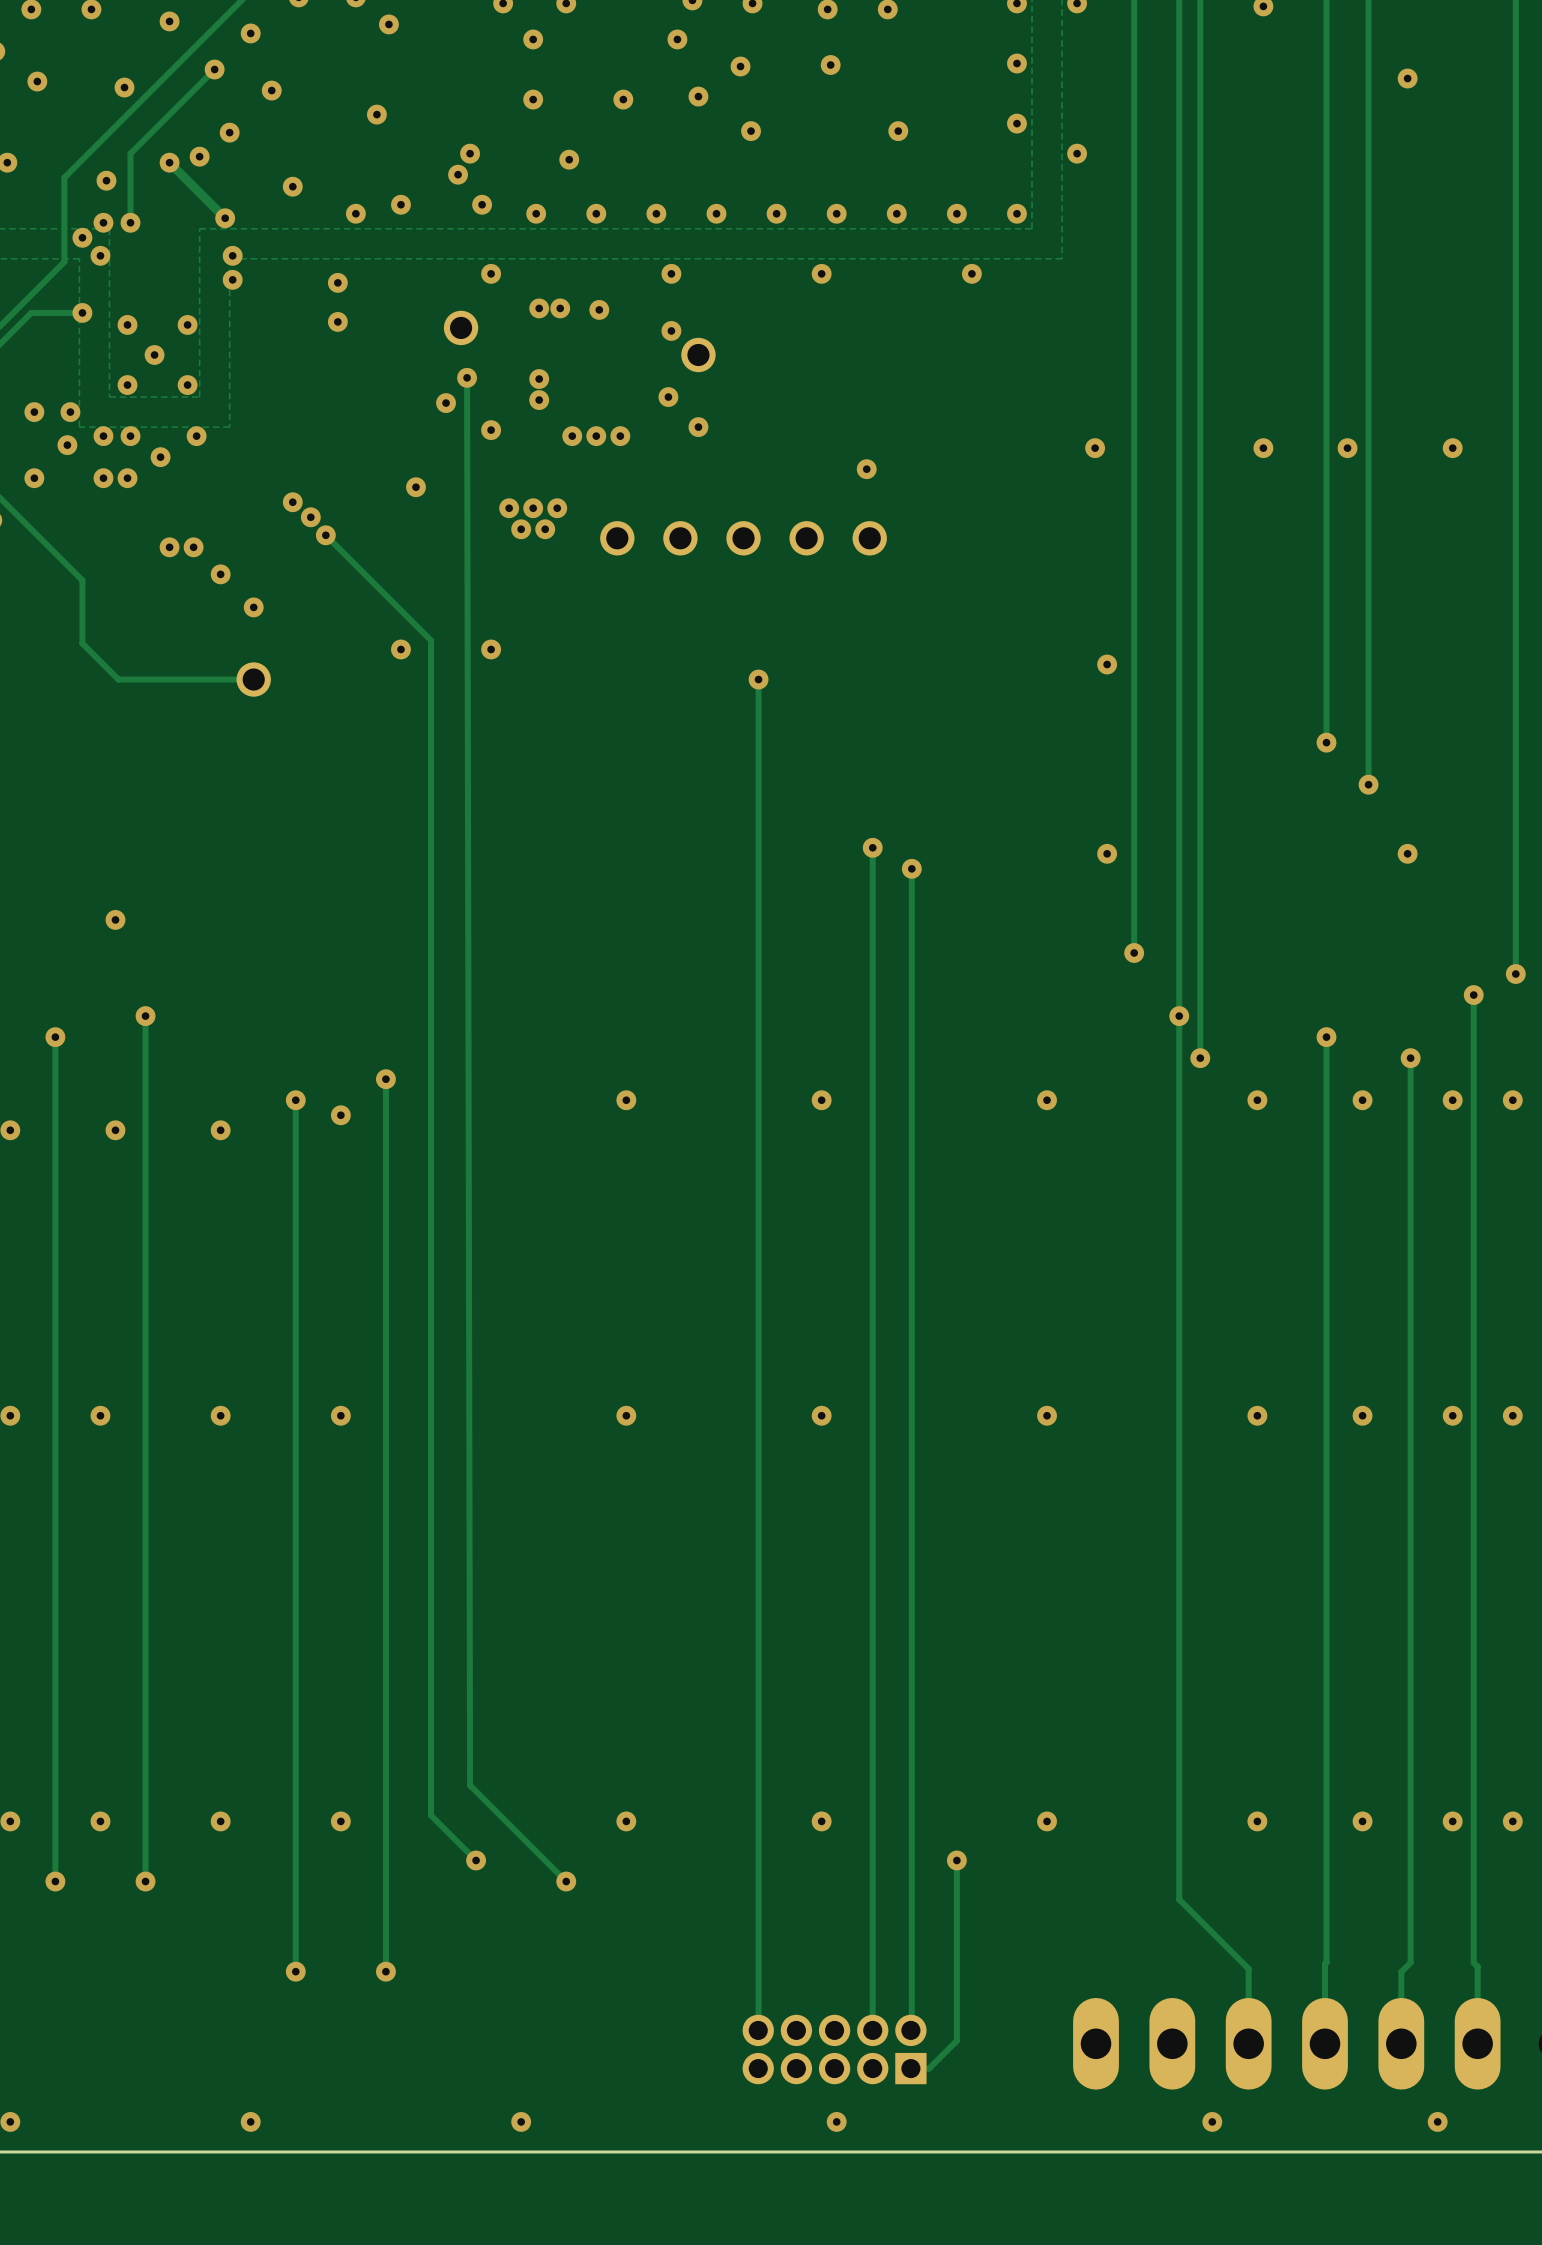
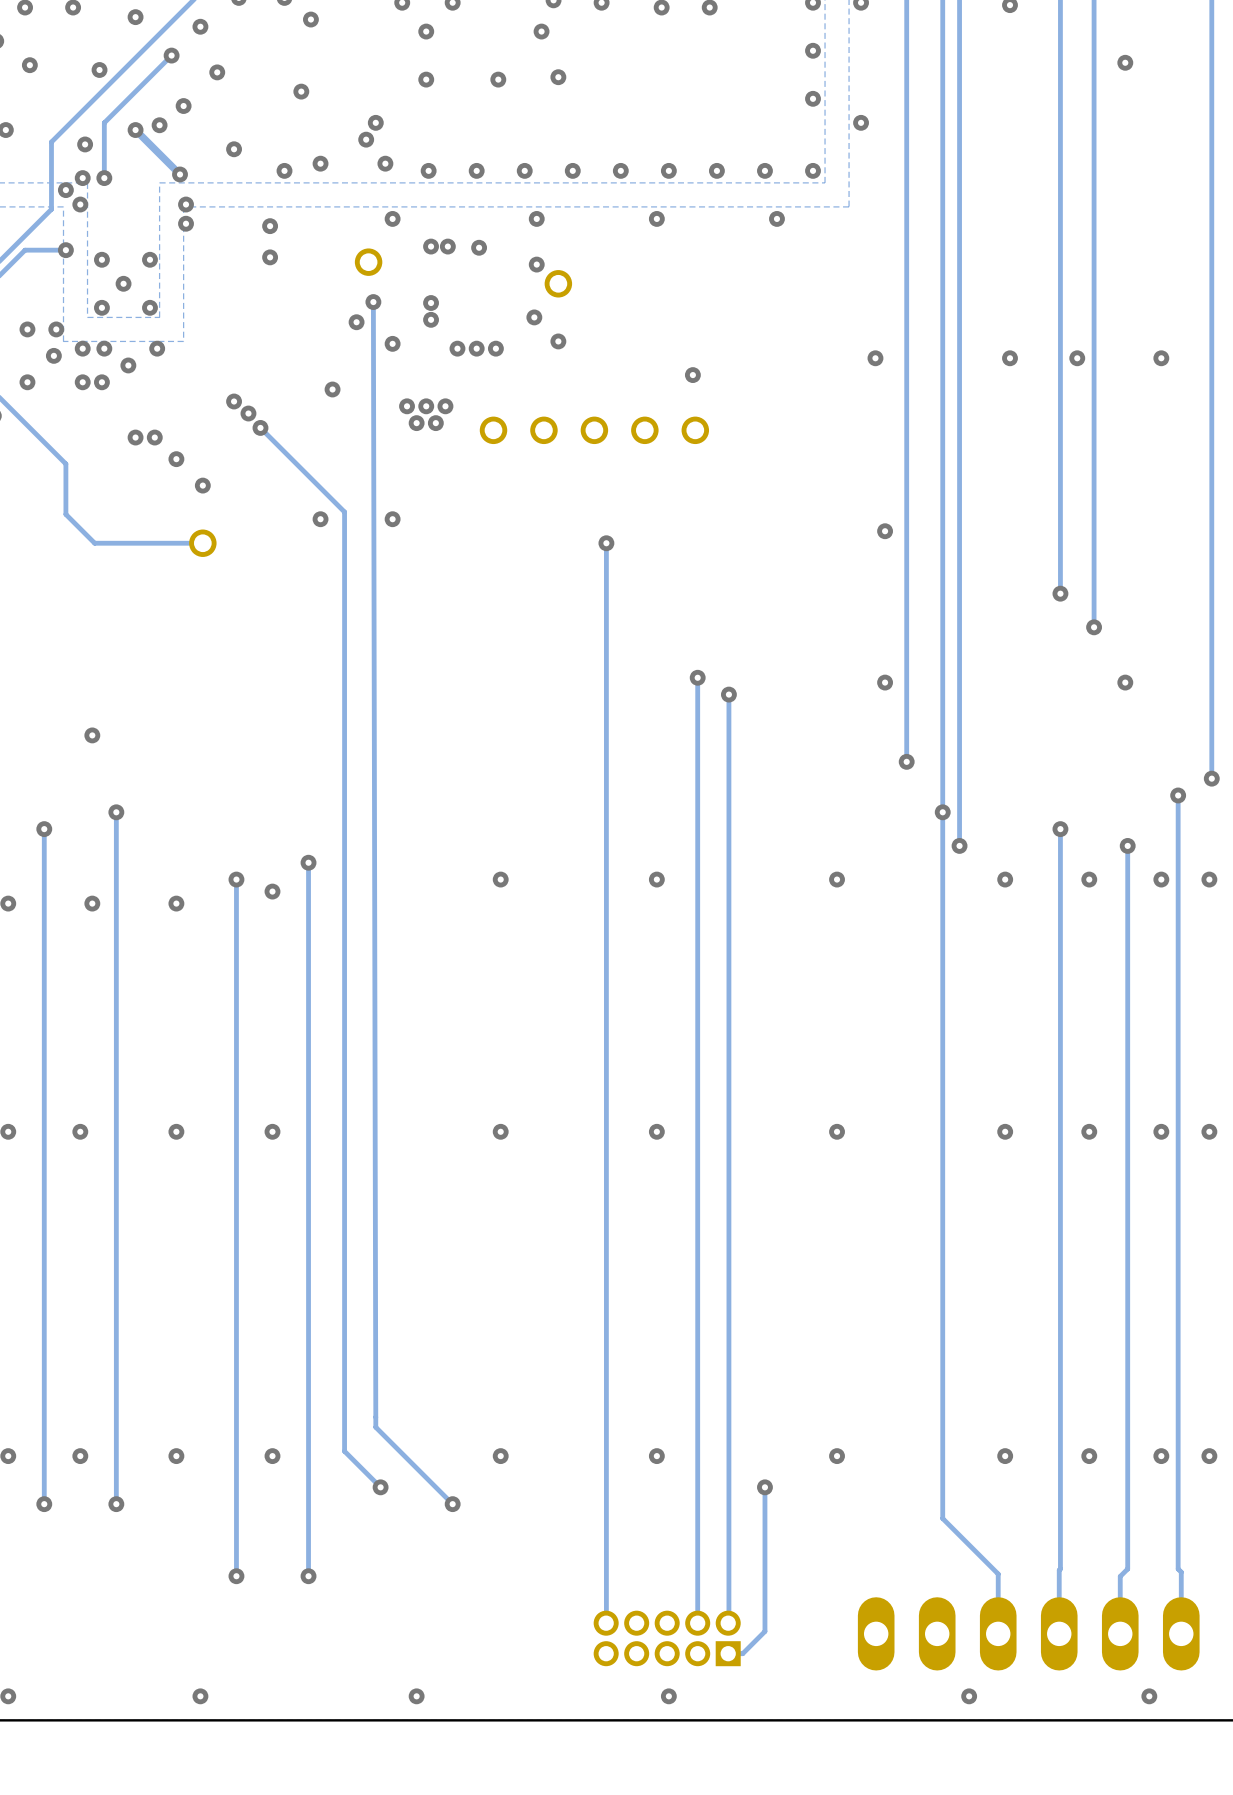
via: (830, 65) -> none
via: (740, 66) -> none
via: (751, 131) -> none
via: (898, 131) -> none
via: (569, 159) -> none

